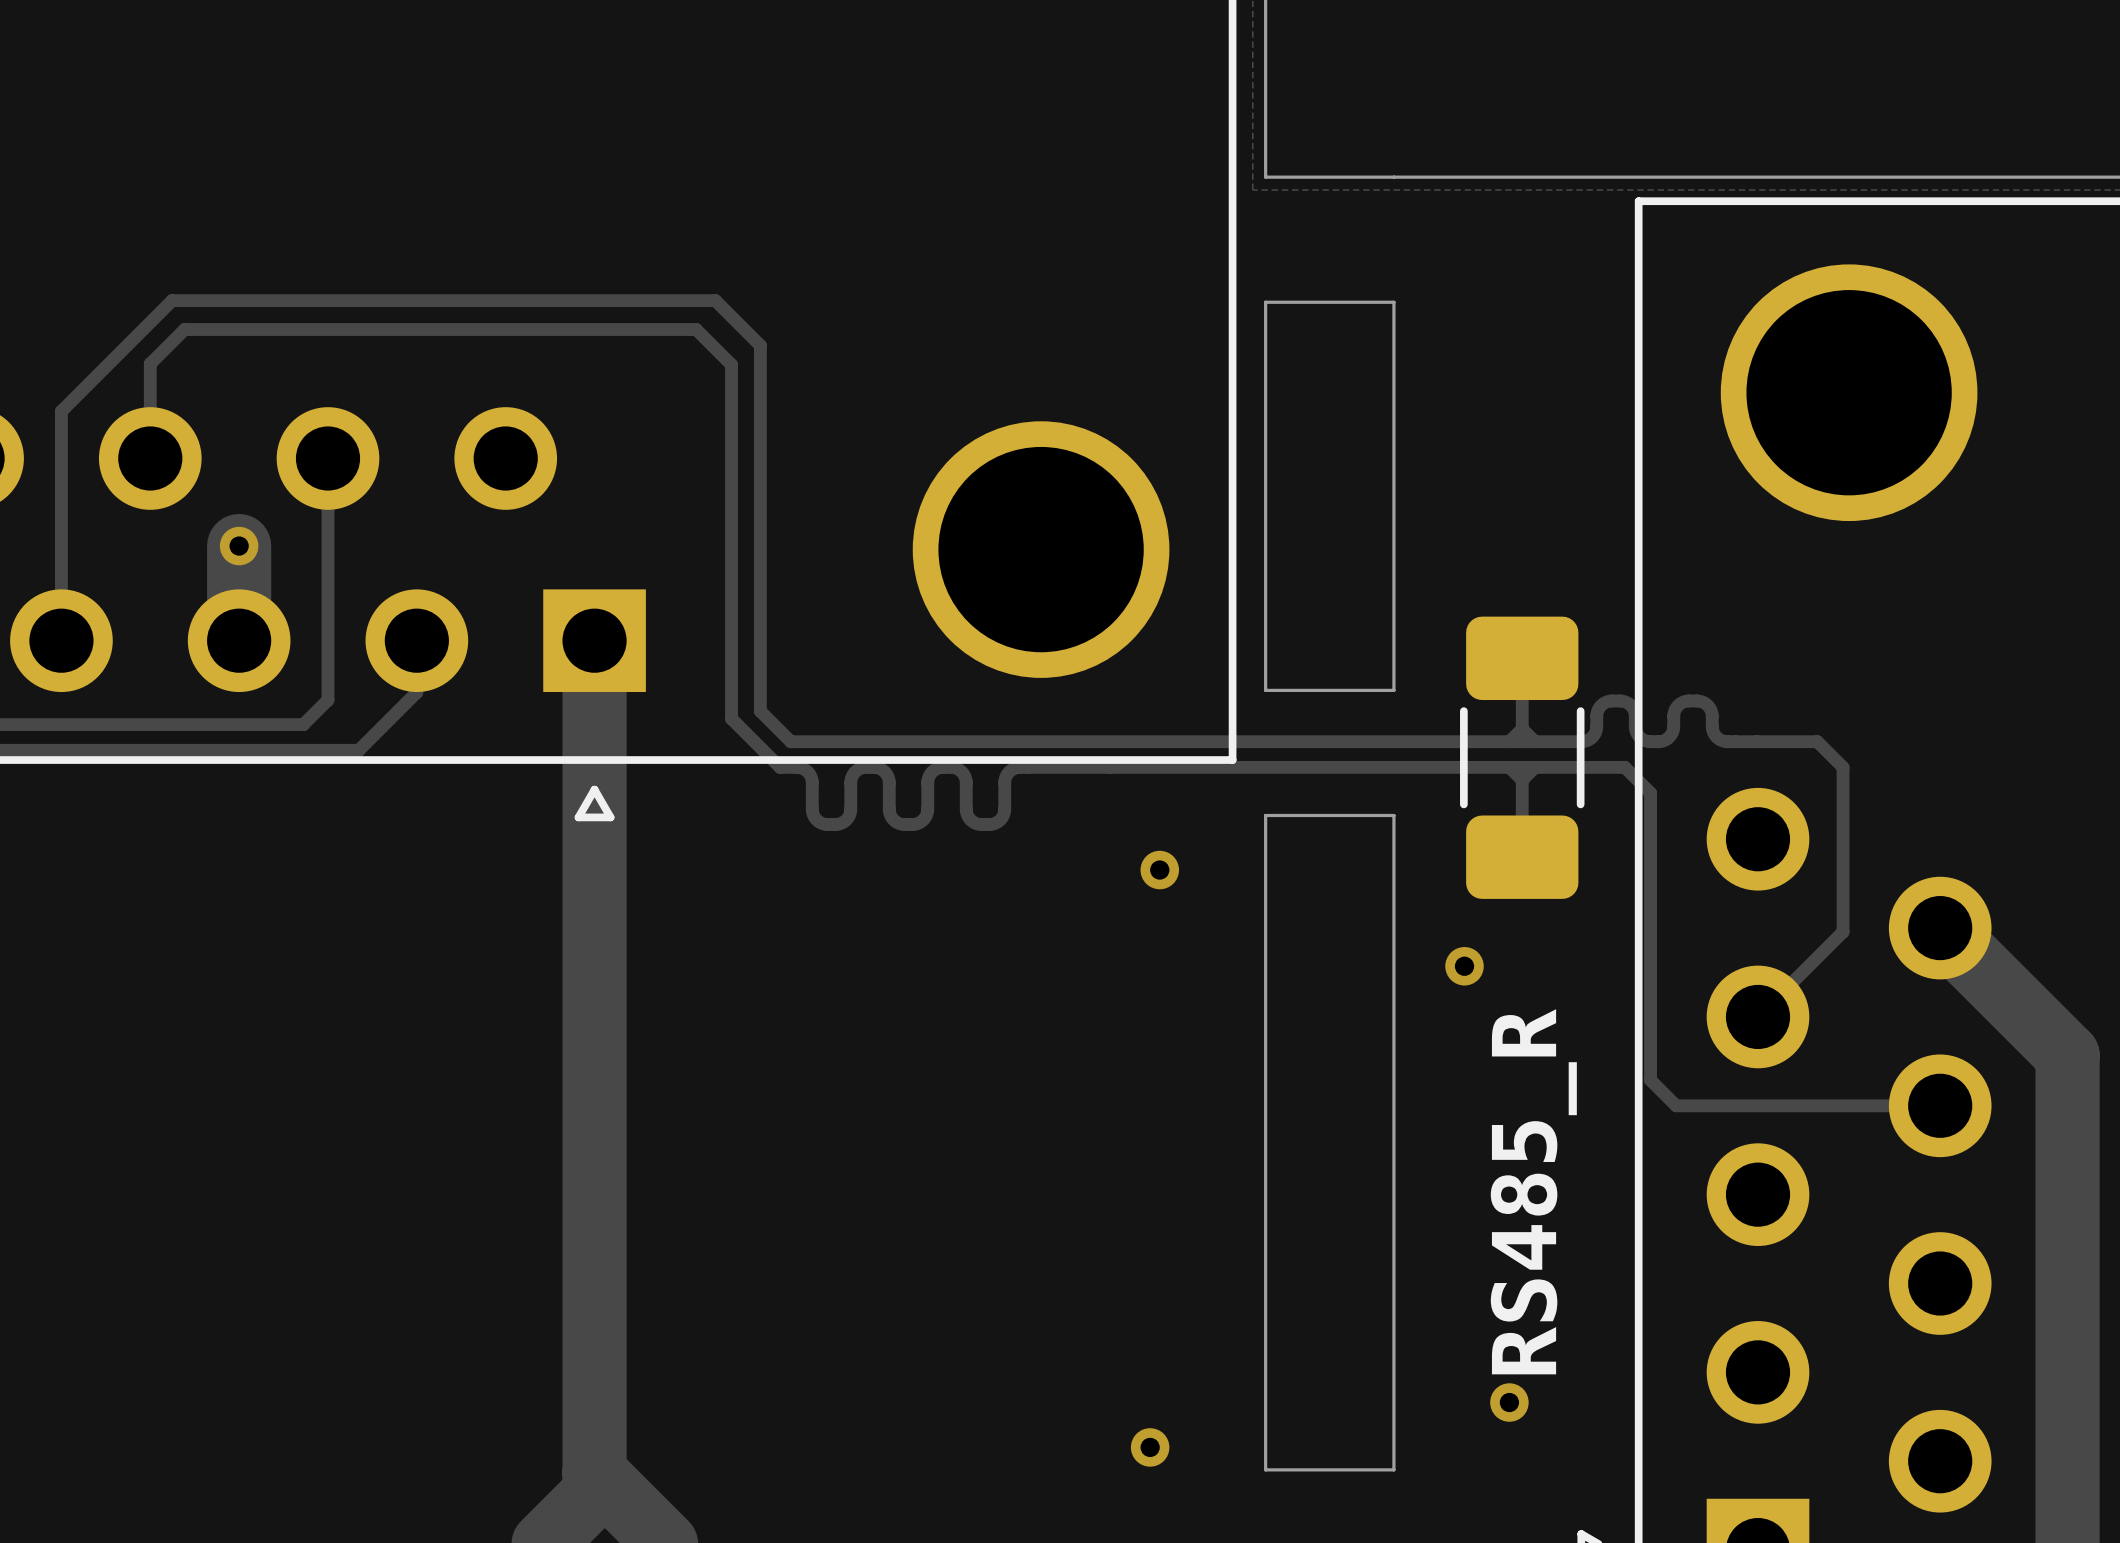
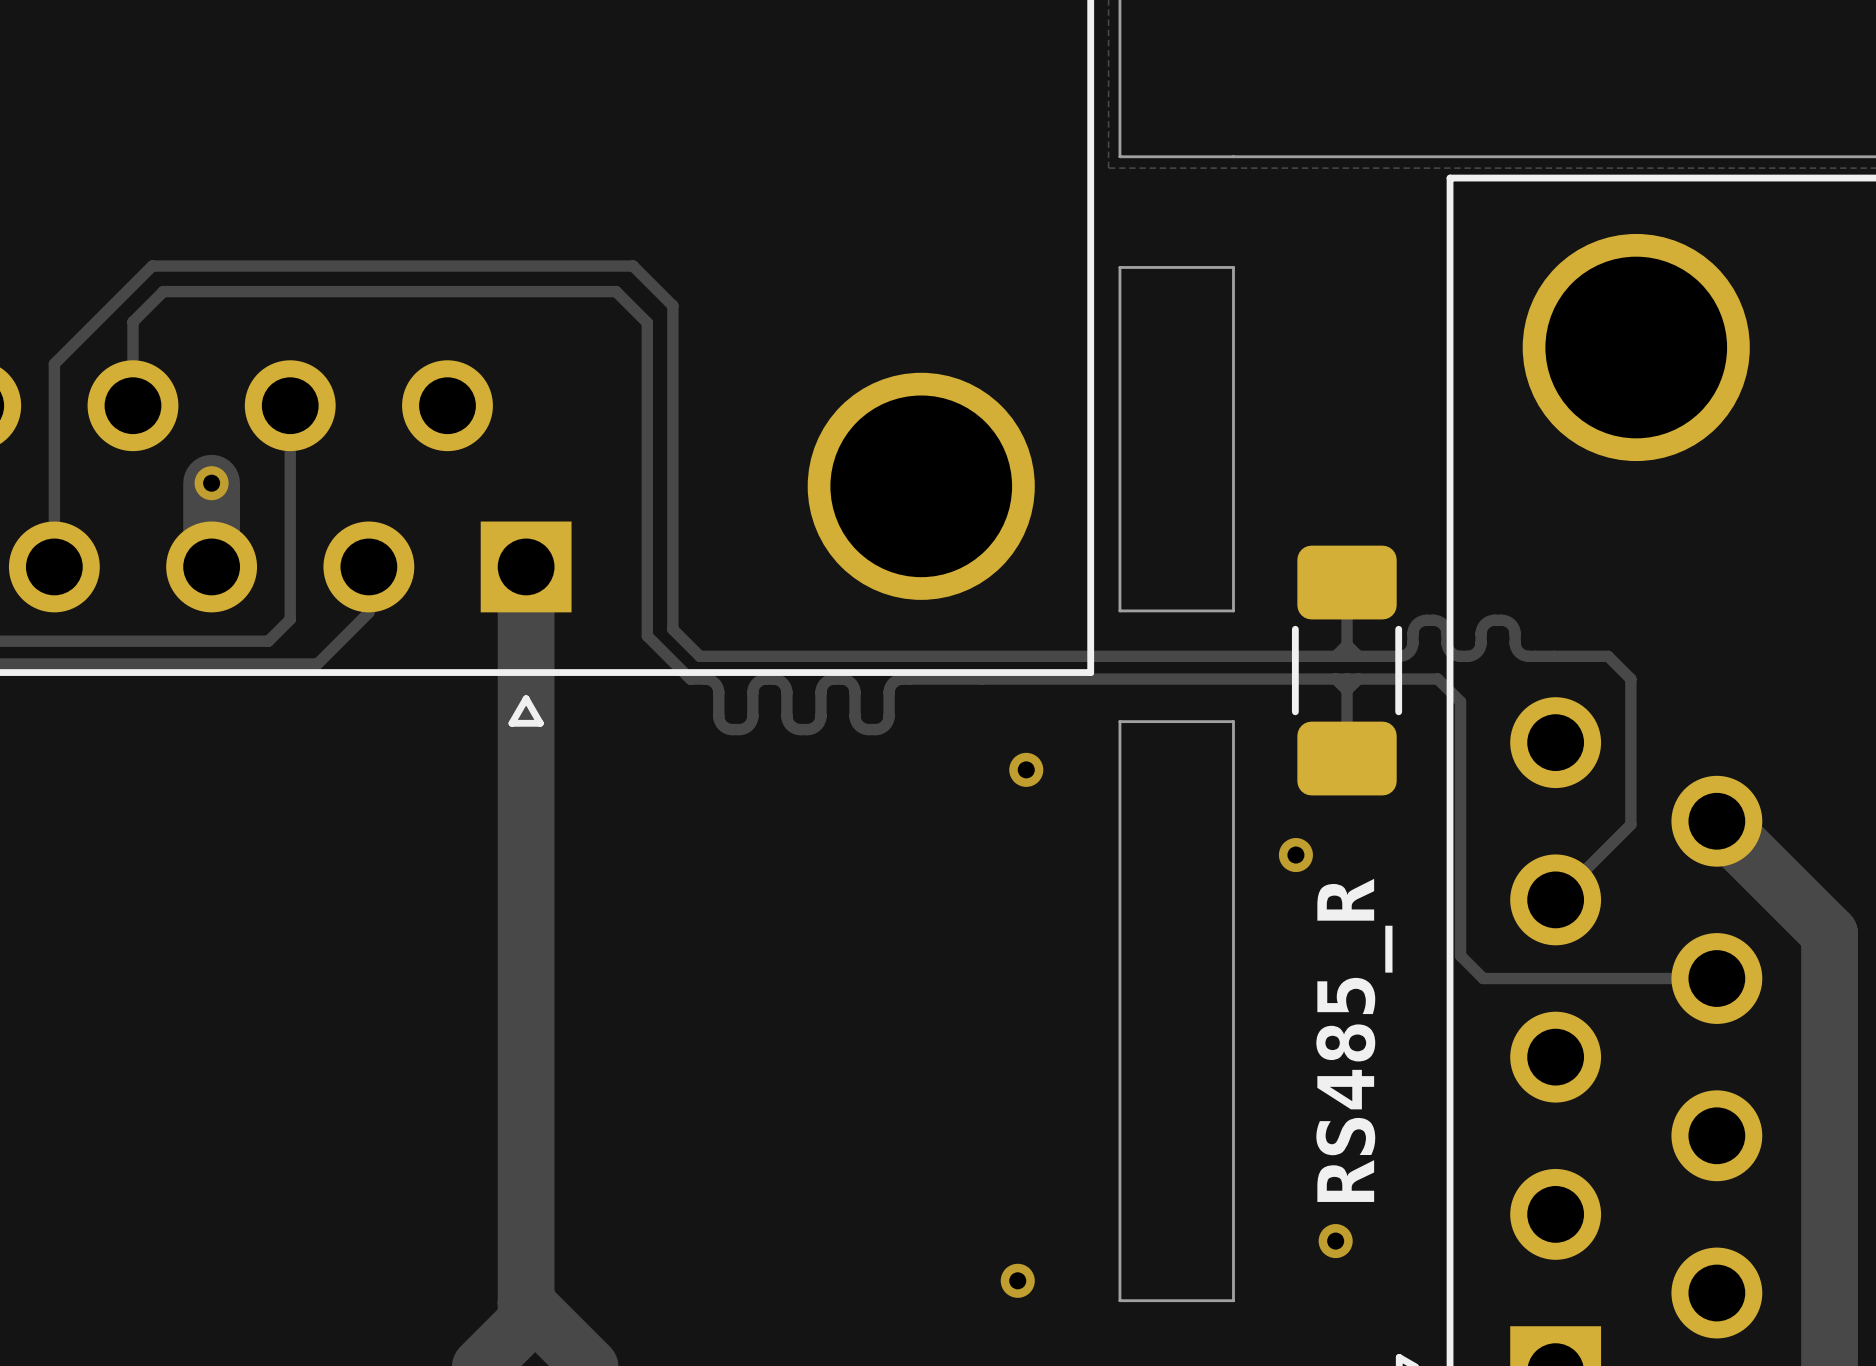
text position: RS485_R (1533, 1191) -> RS485_R (1354, 1040)

